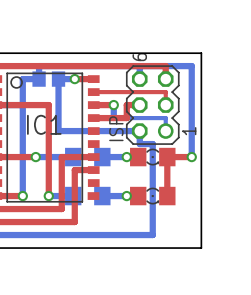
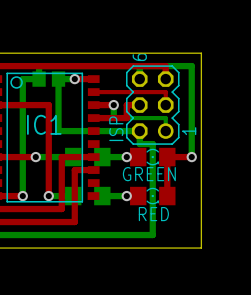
GREEN name: none -> GREEN (149, 174)
RED name: none -> RED (153, 214)

